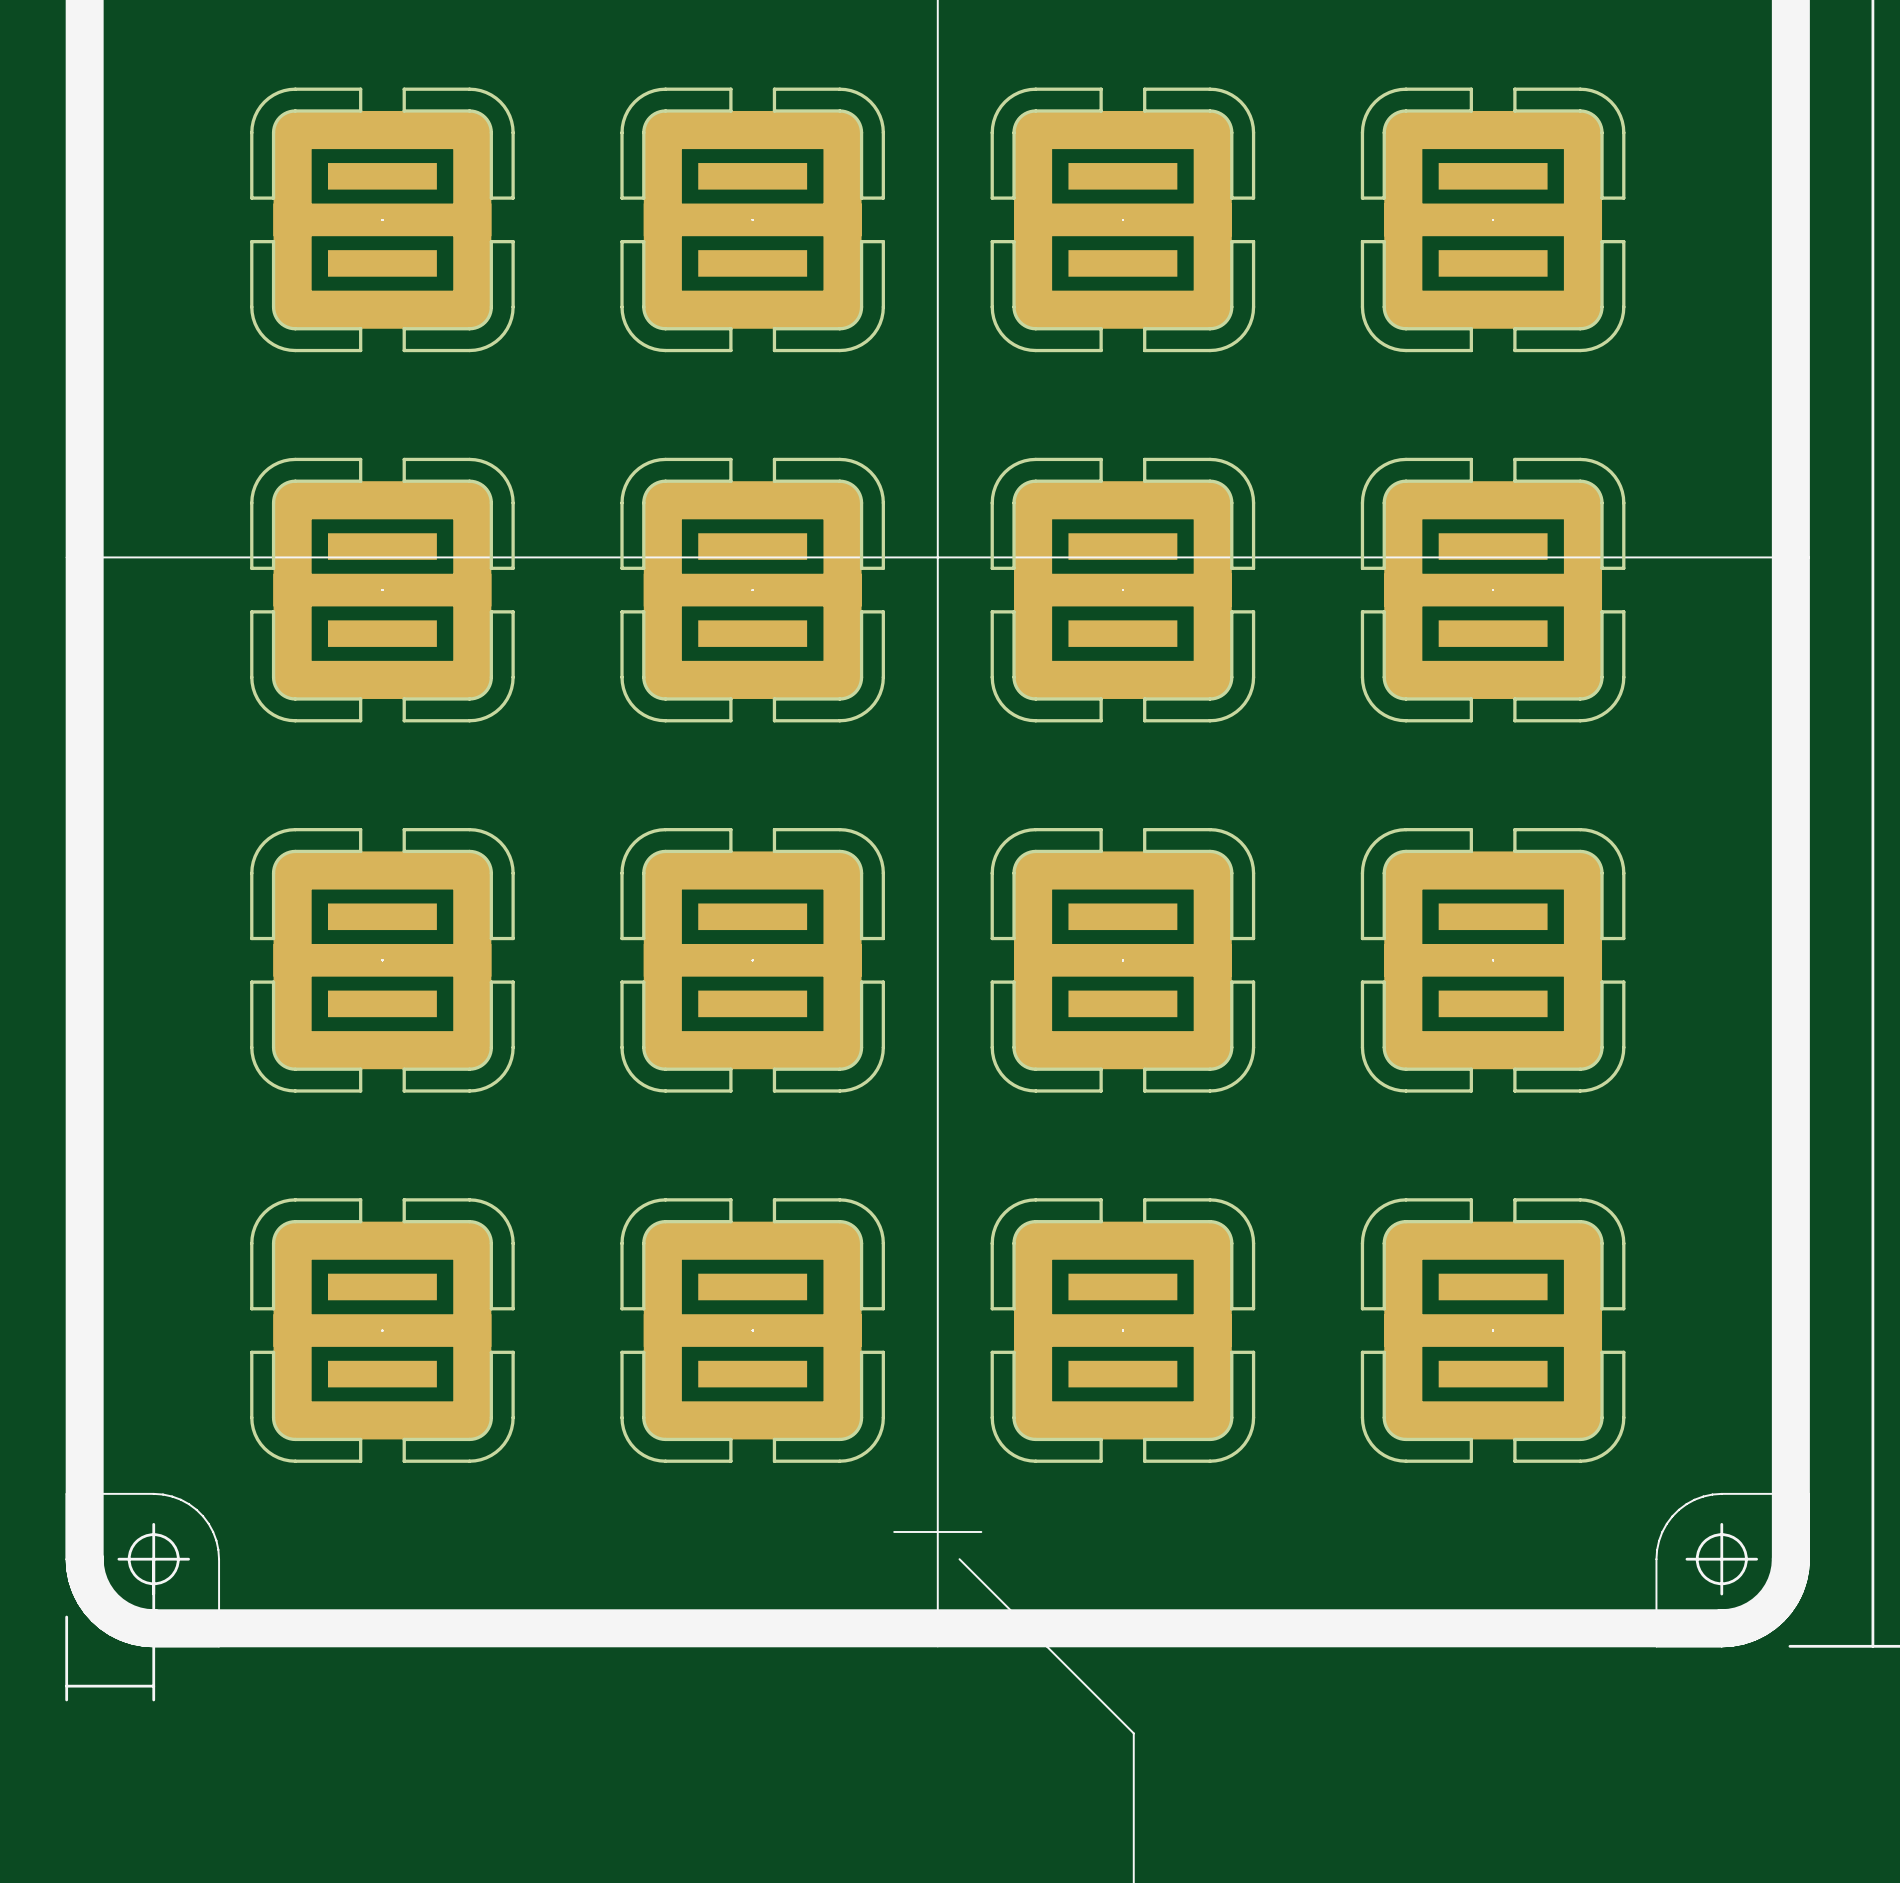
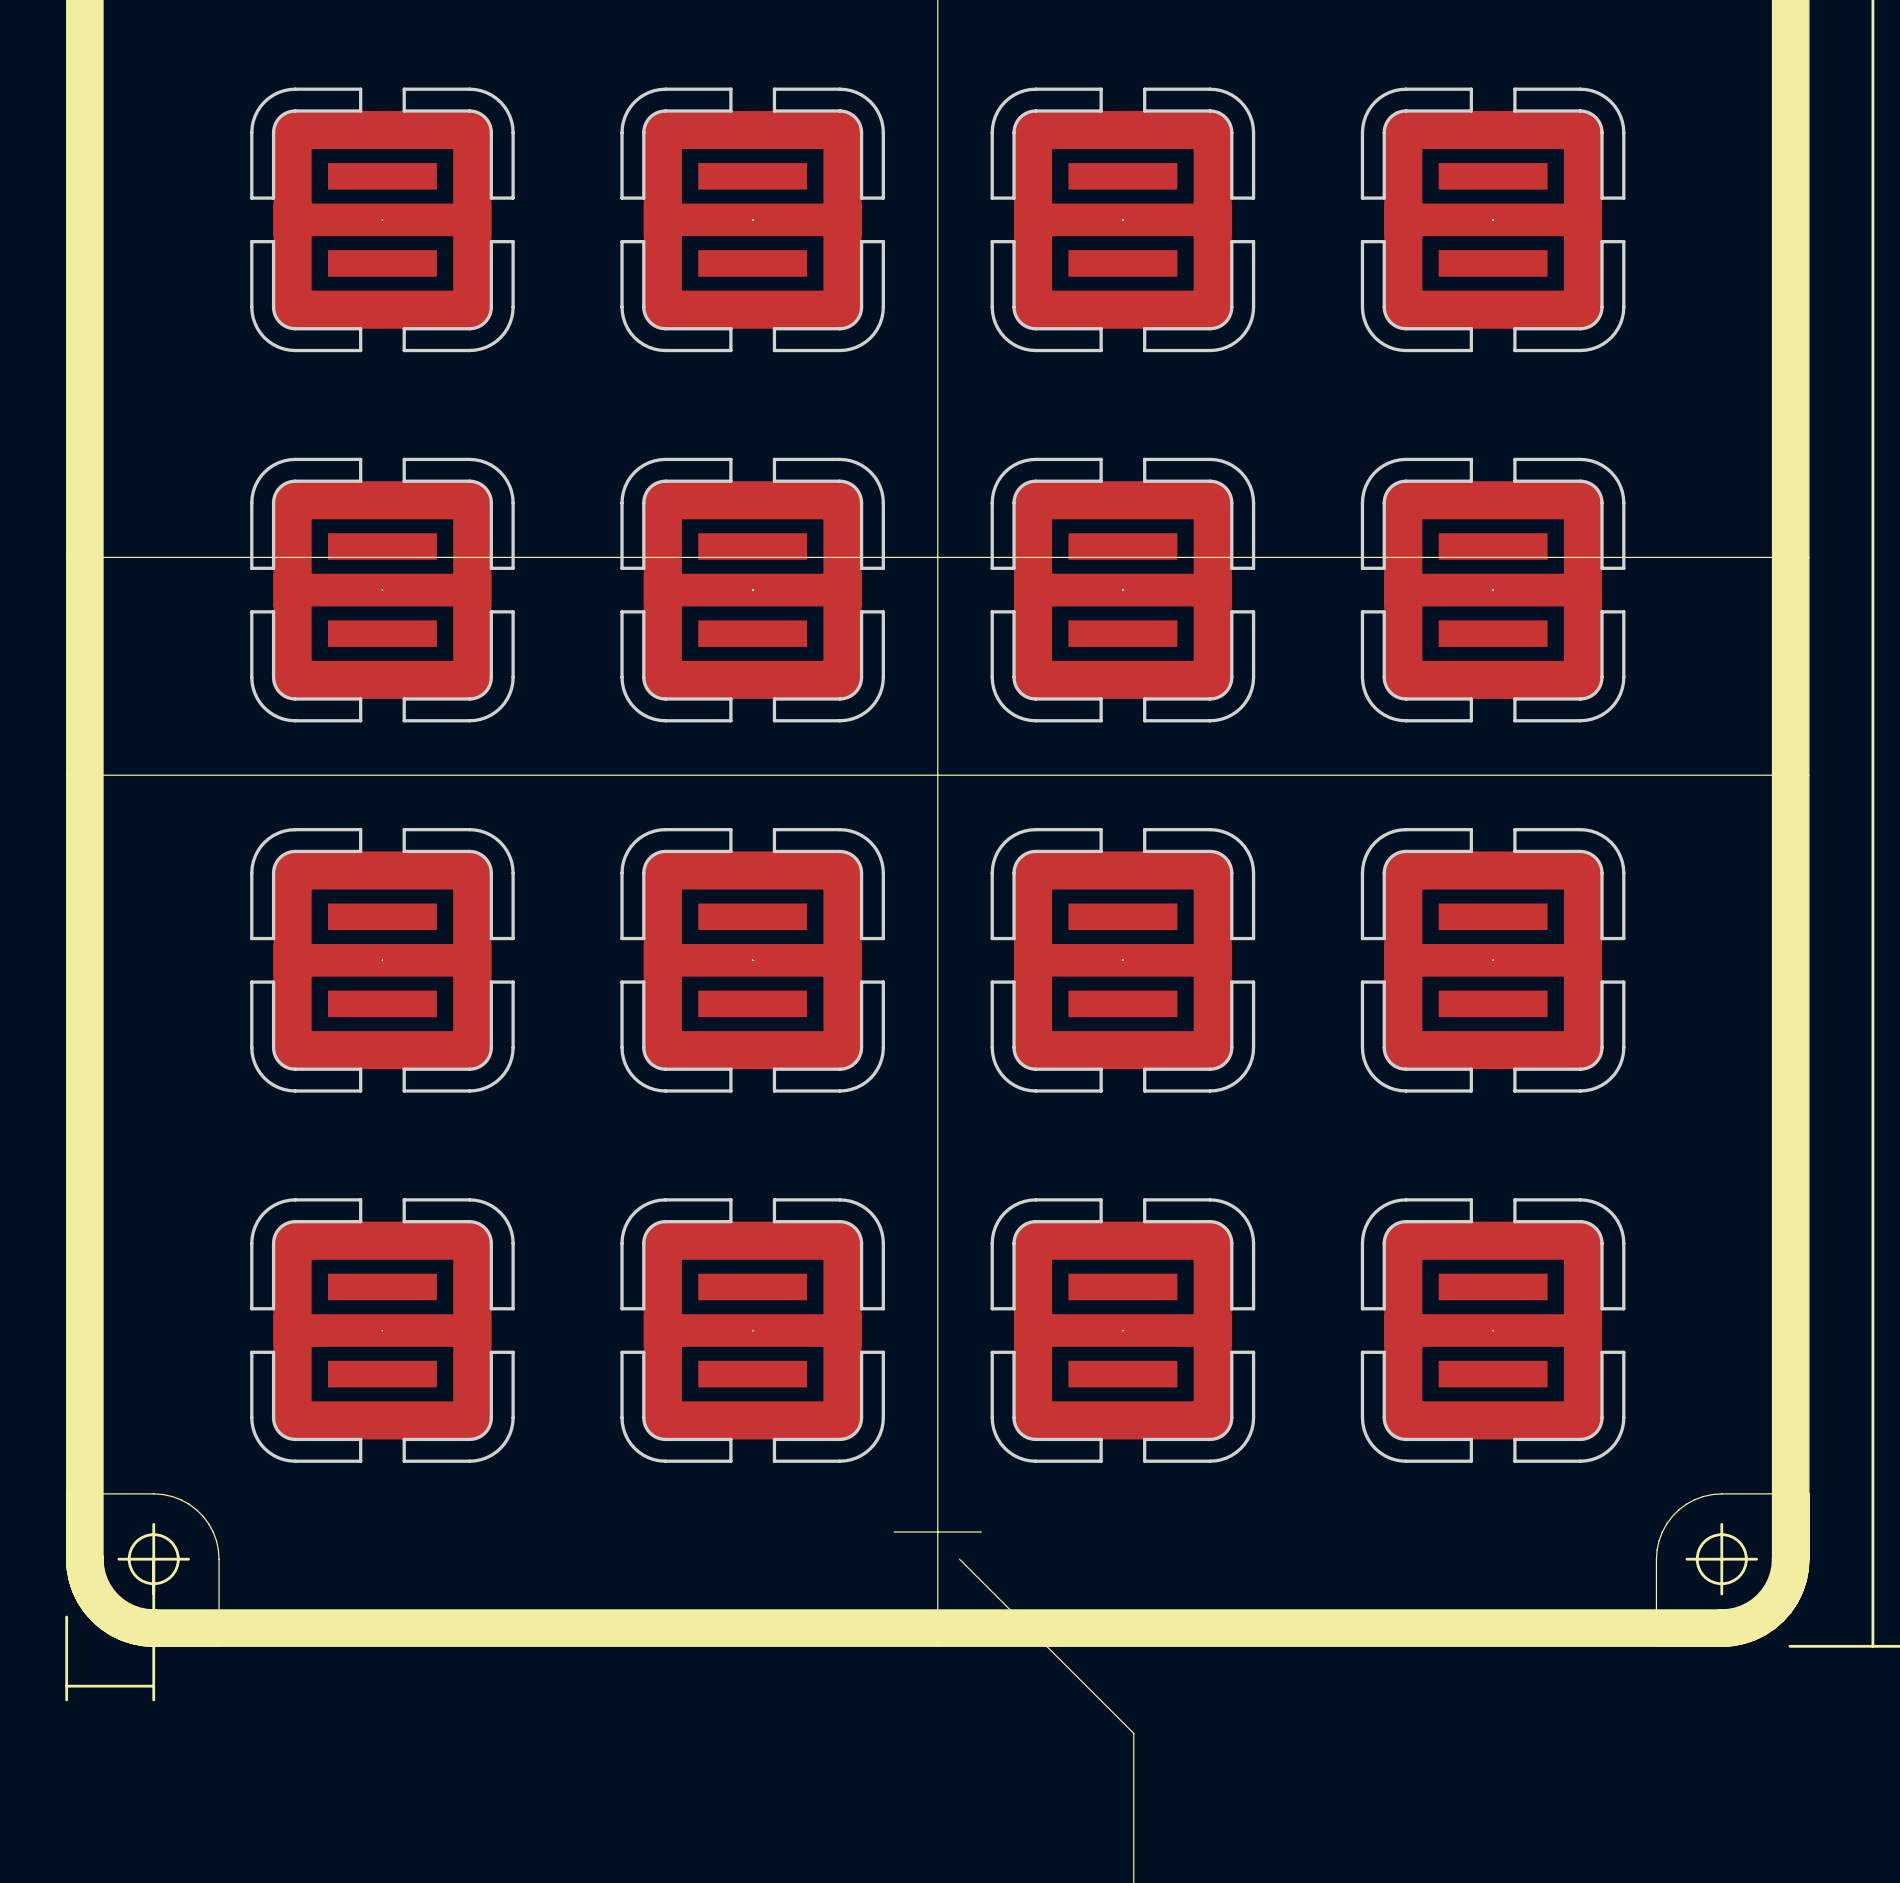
drawing: none -> [66, 775, 1809, 776]

